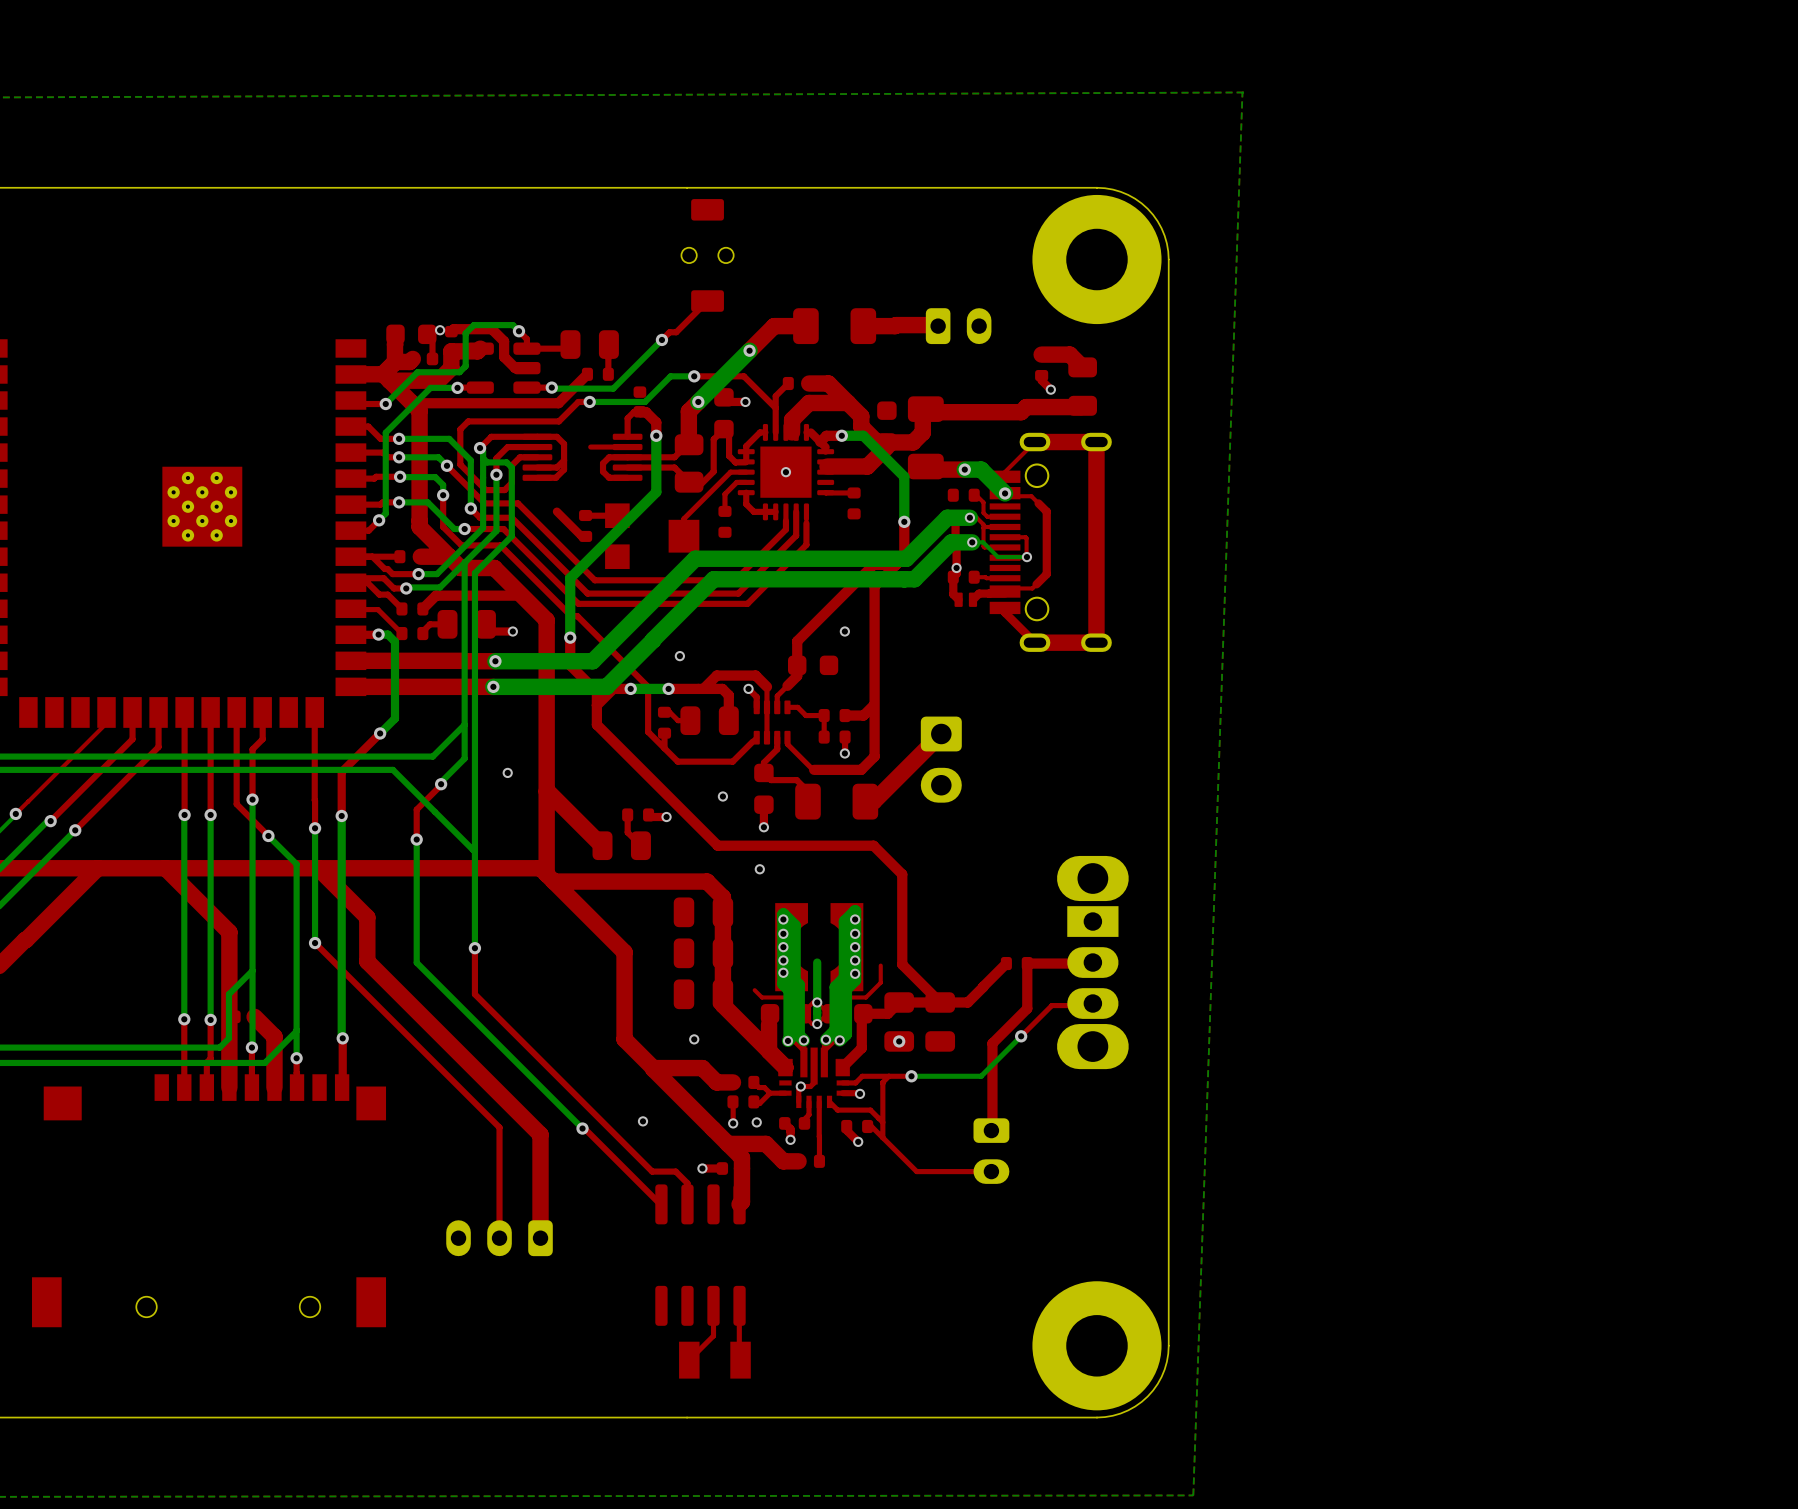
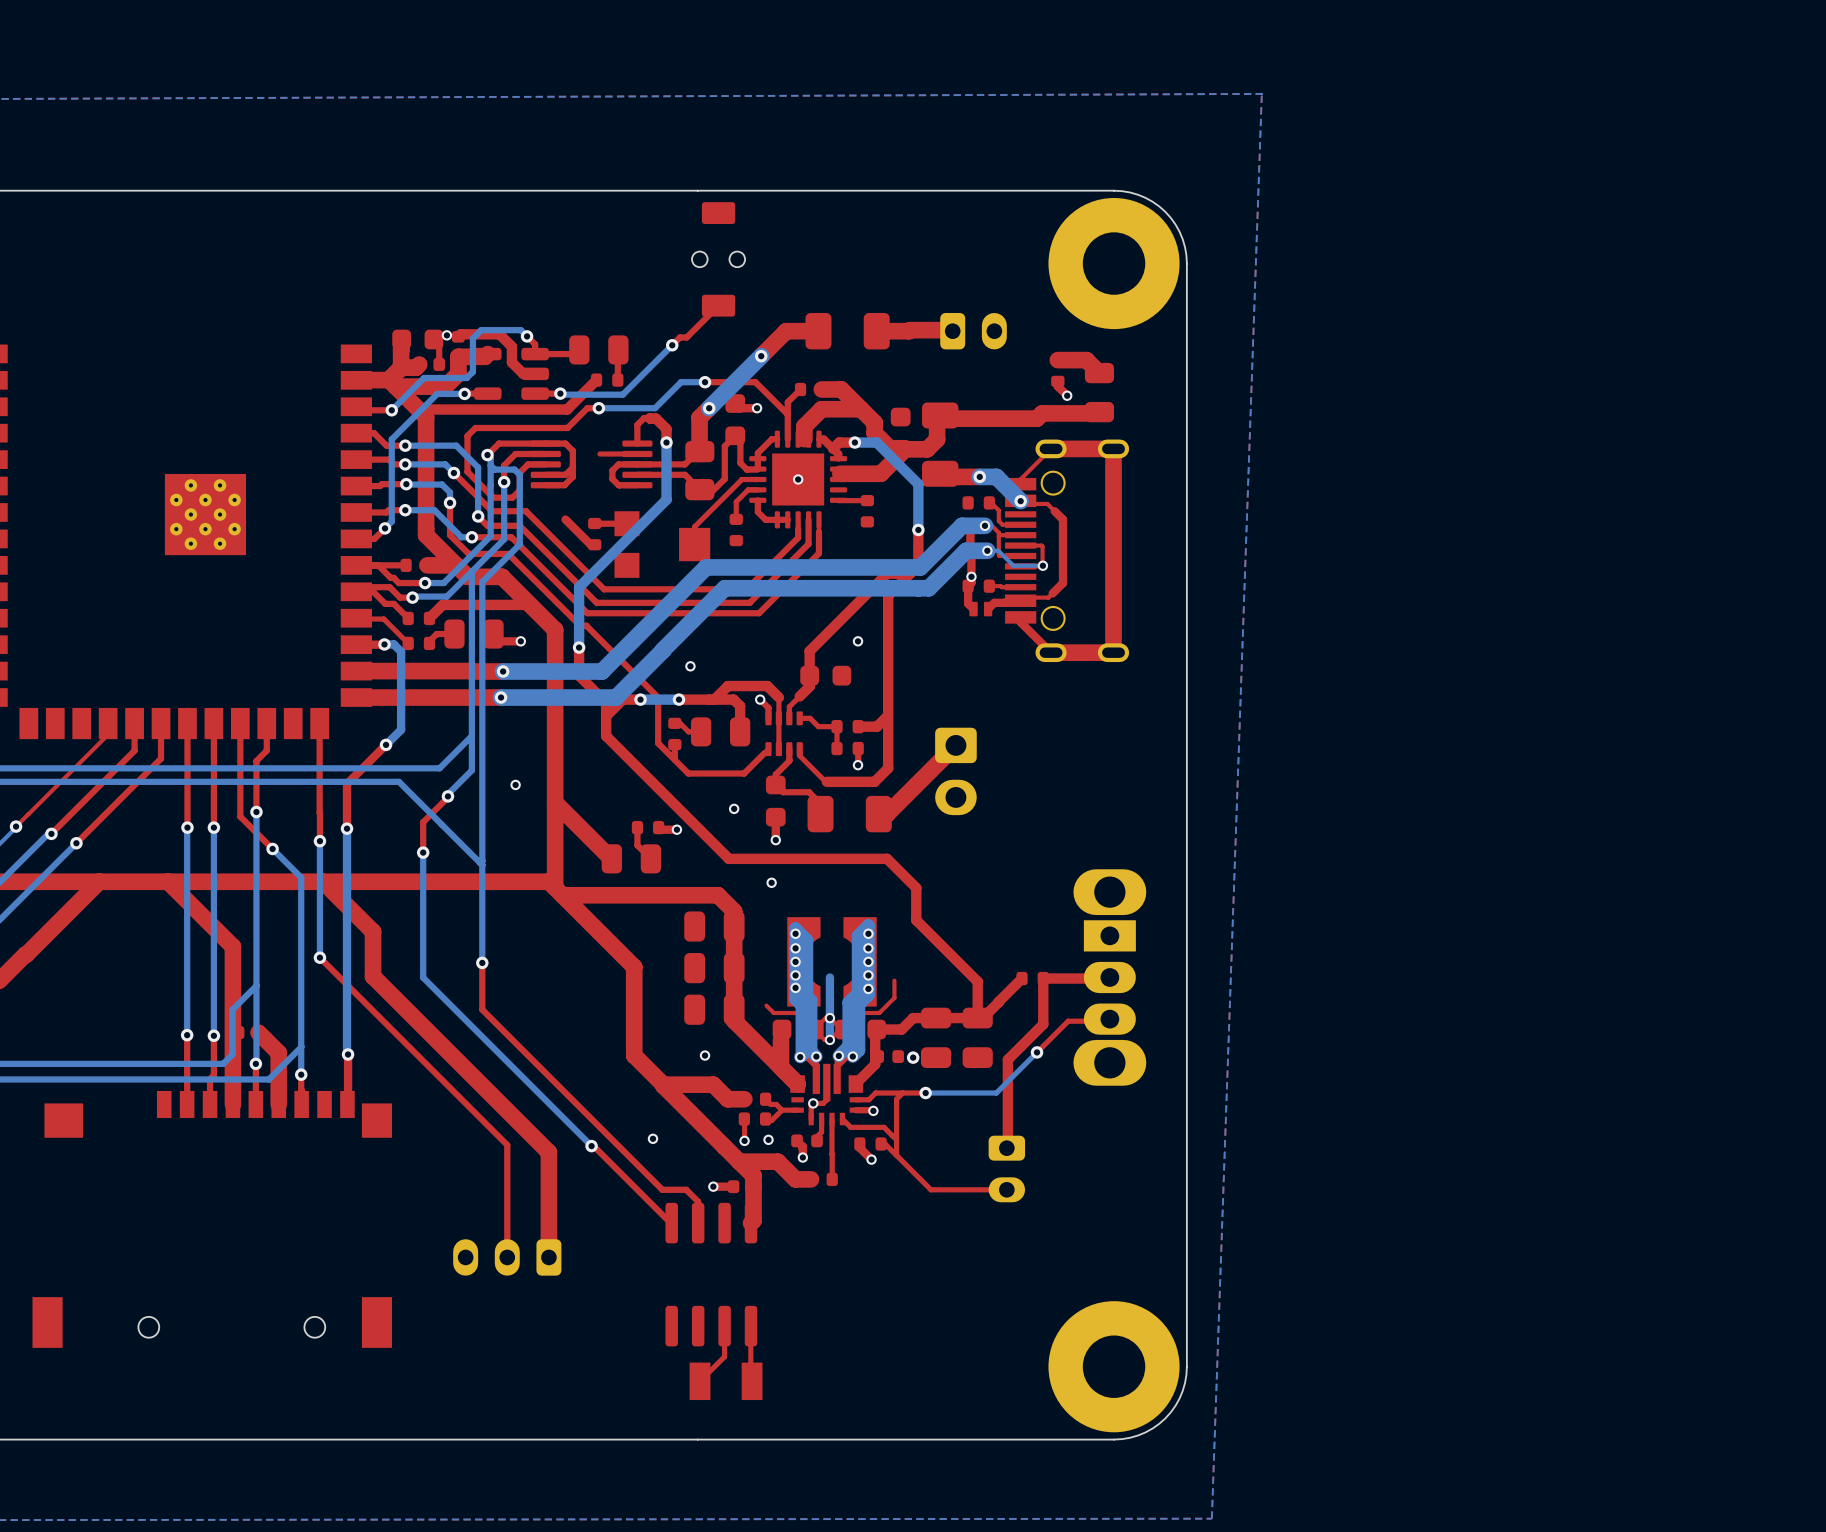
part: (639, 401) -> none
top track: (902, 906) (902, 964) (940, 1002) -> (916, 920) (977, 981) (977, 1018)
part: (899, 1021) -> none
part: none -> (936, 1037)
part: (940, 1021) -> none
part: none -> (977, 1037)
part: none -> (888, 1056)

